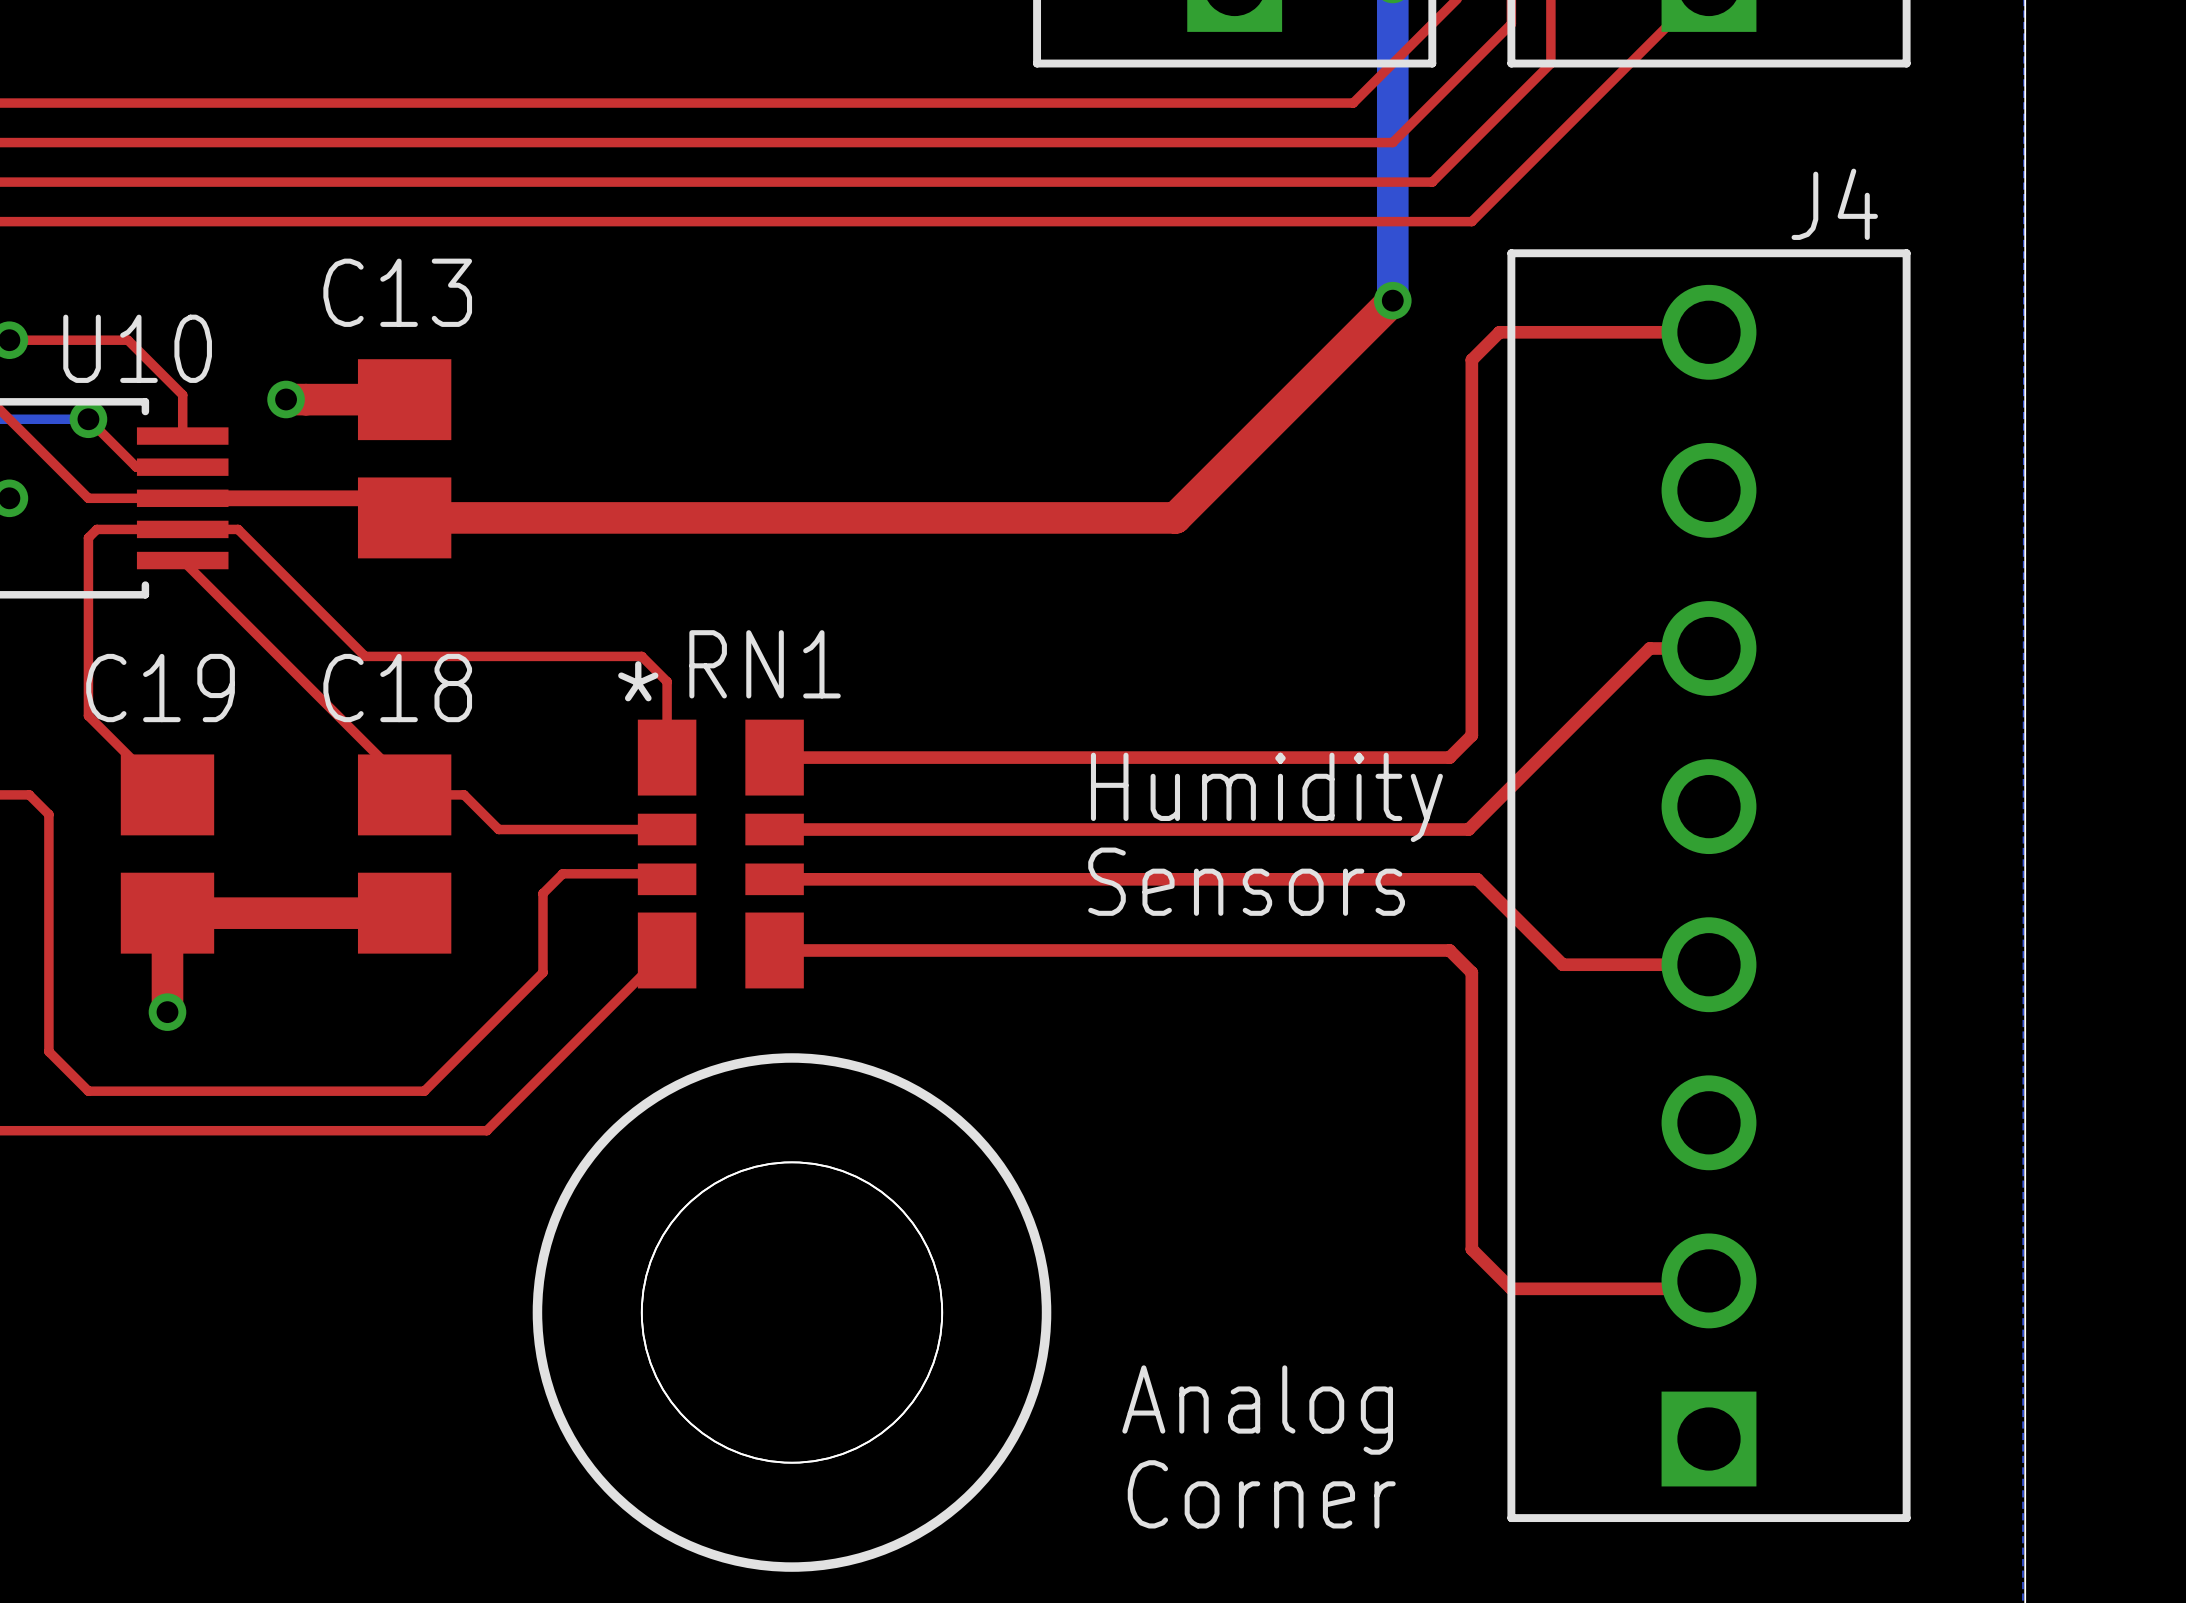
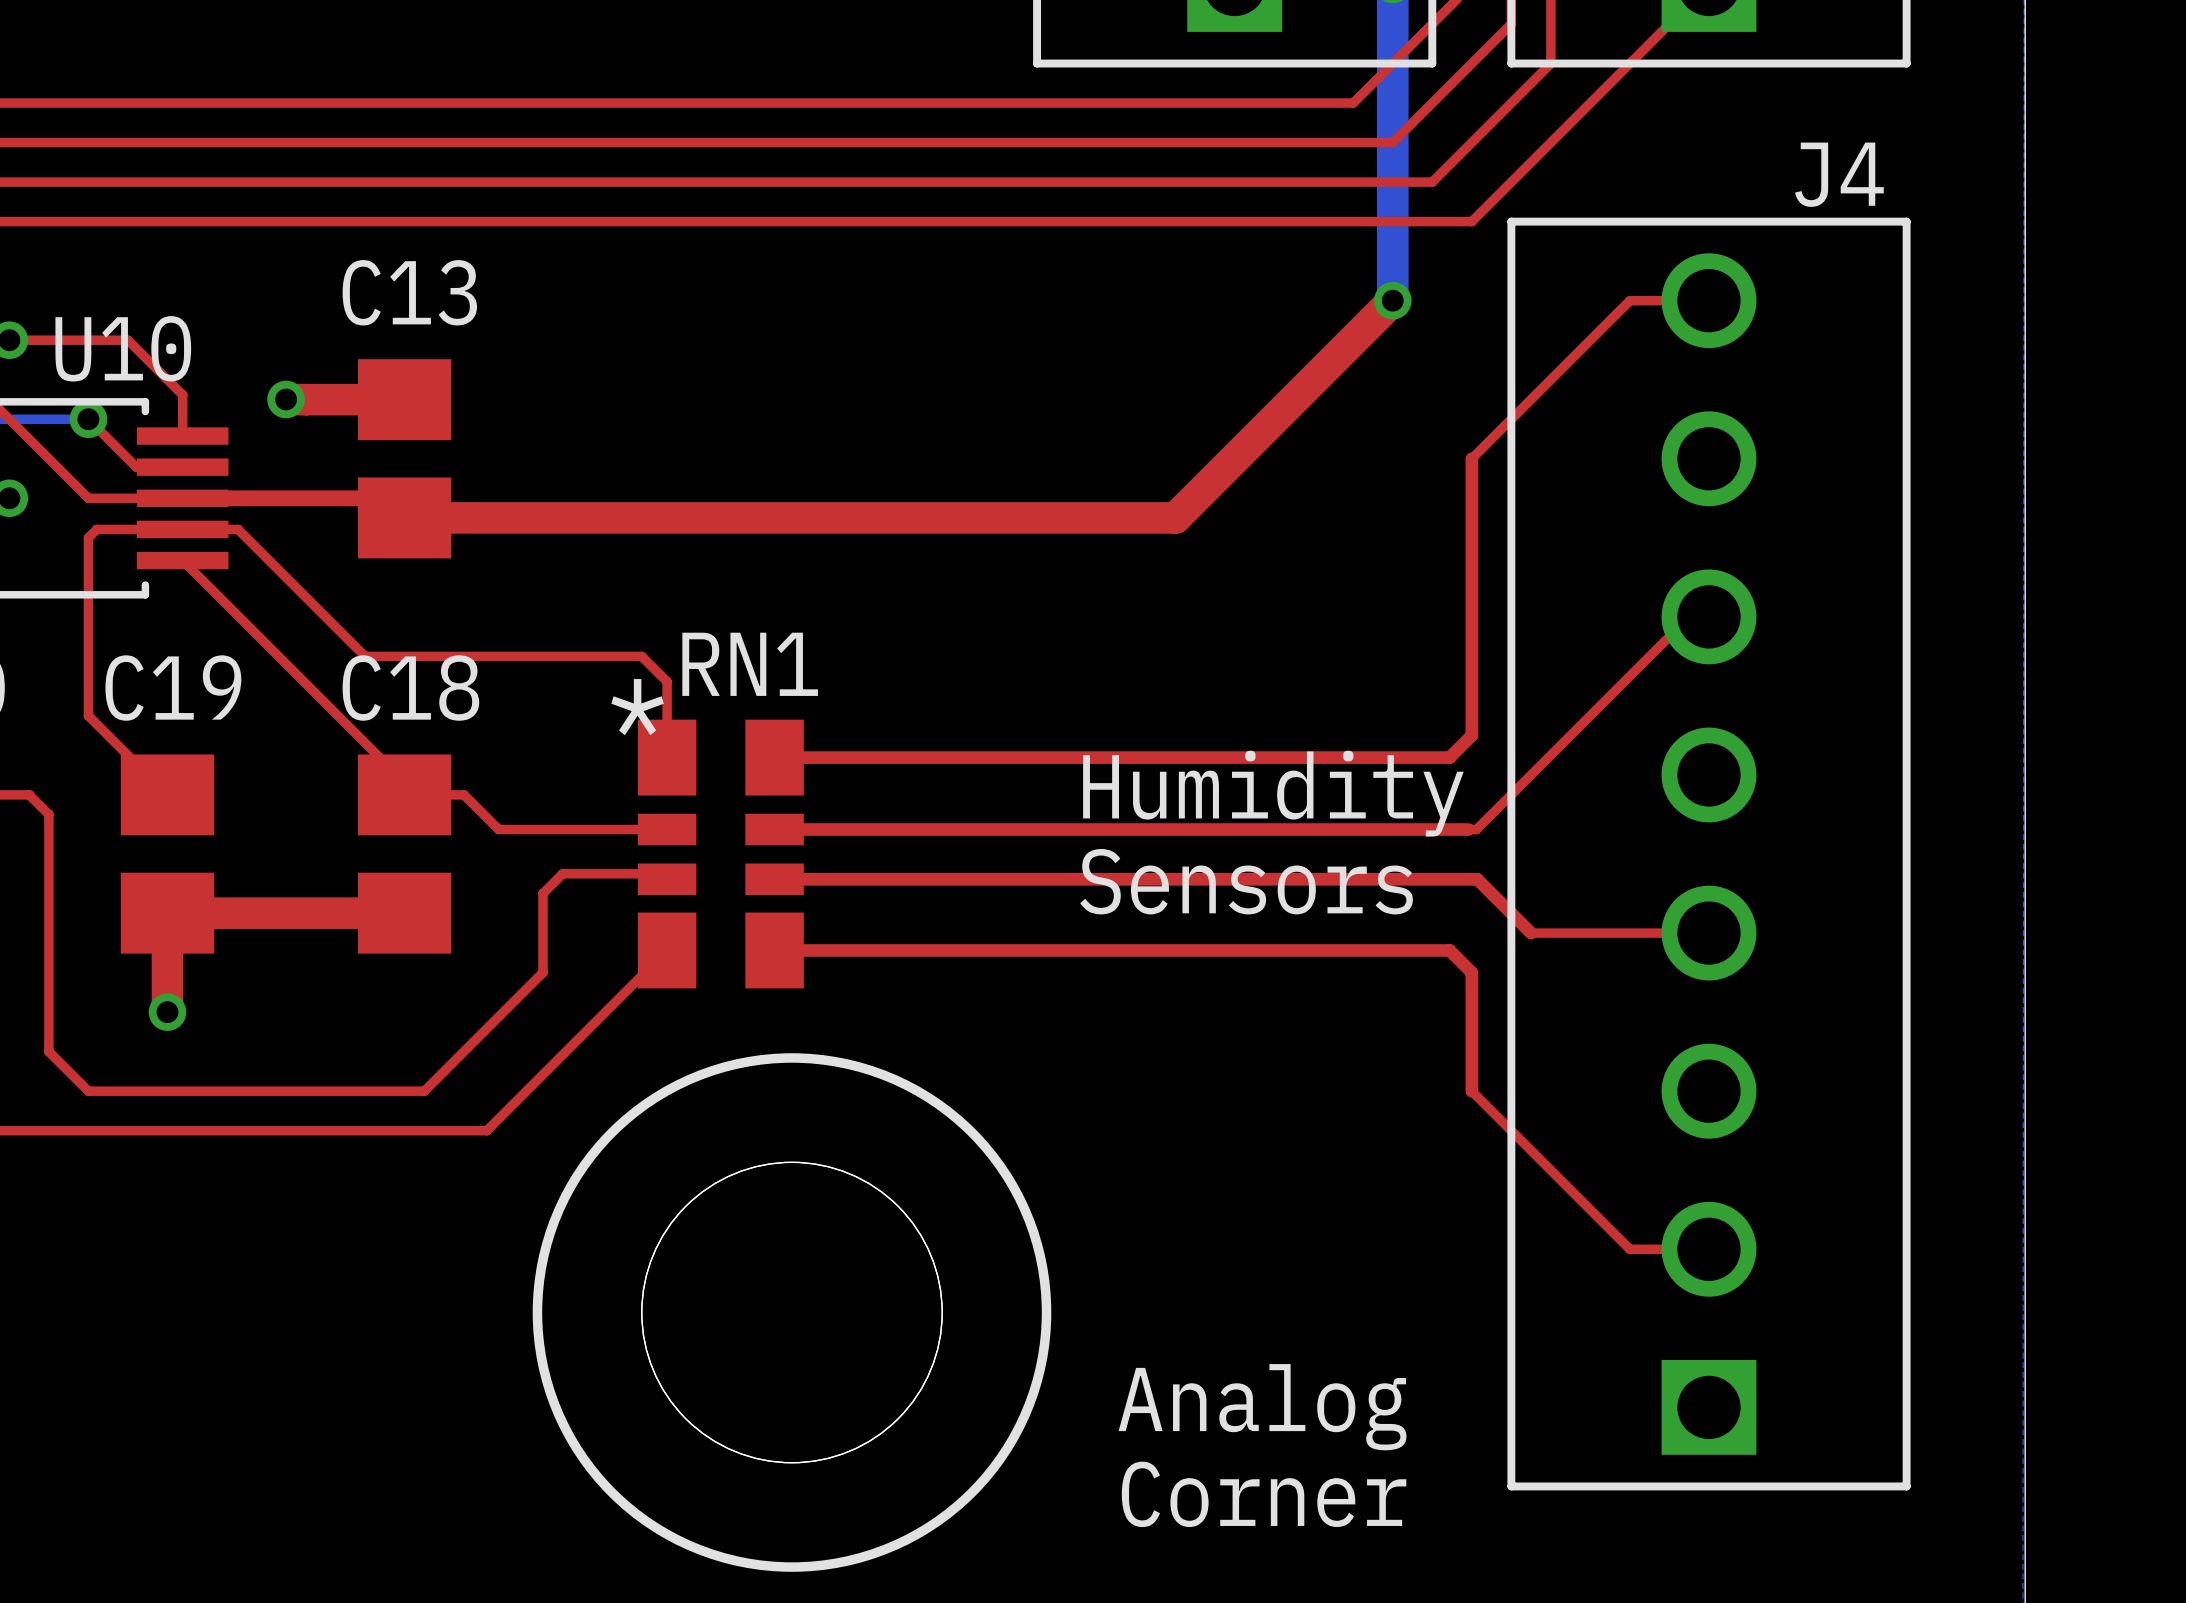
top track: (1708, 332) (1499, 332) (1471, 359) (1471, 458) -> (1708, 300) (1629, 300) (1471, 458)
top track: (1708, 648) (1649, 648) (1468, 829) -> (1708, 616) (1689, 616) (1476, 829) (1468, 829)
J4 position: (1708, 885) -> (1708, 854)
top track: (1531, 933) (1562, 964) (1708, 964) -> (1531, 933) (1708, 933)
top track: (1471, 1091) (1471, 1249) (1511, 1288) (1701, 1288) (1708, 1280) -> (1471, 1091) (1629, 1249) (1708, 1249)

